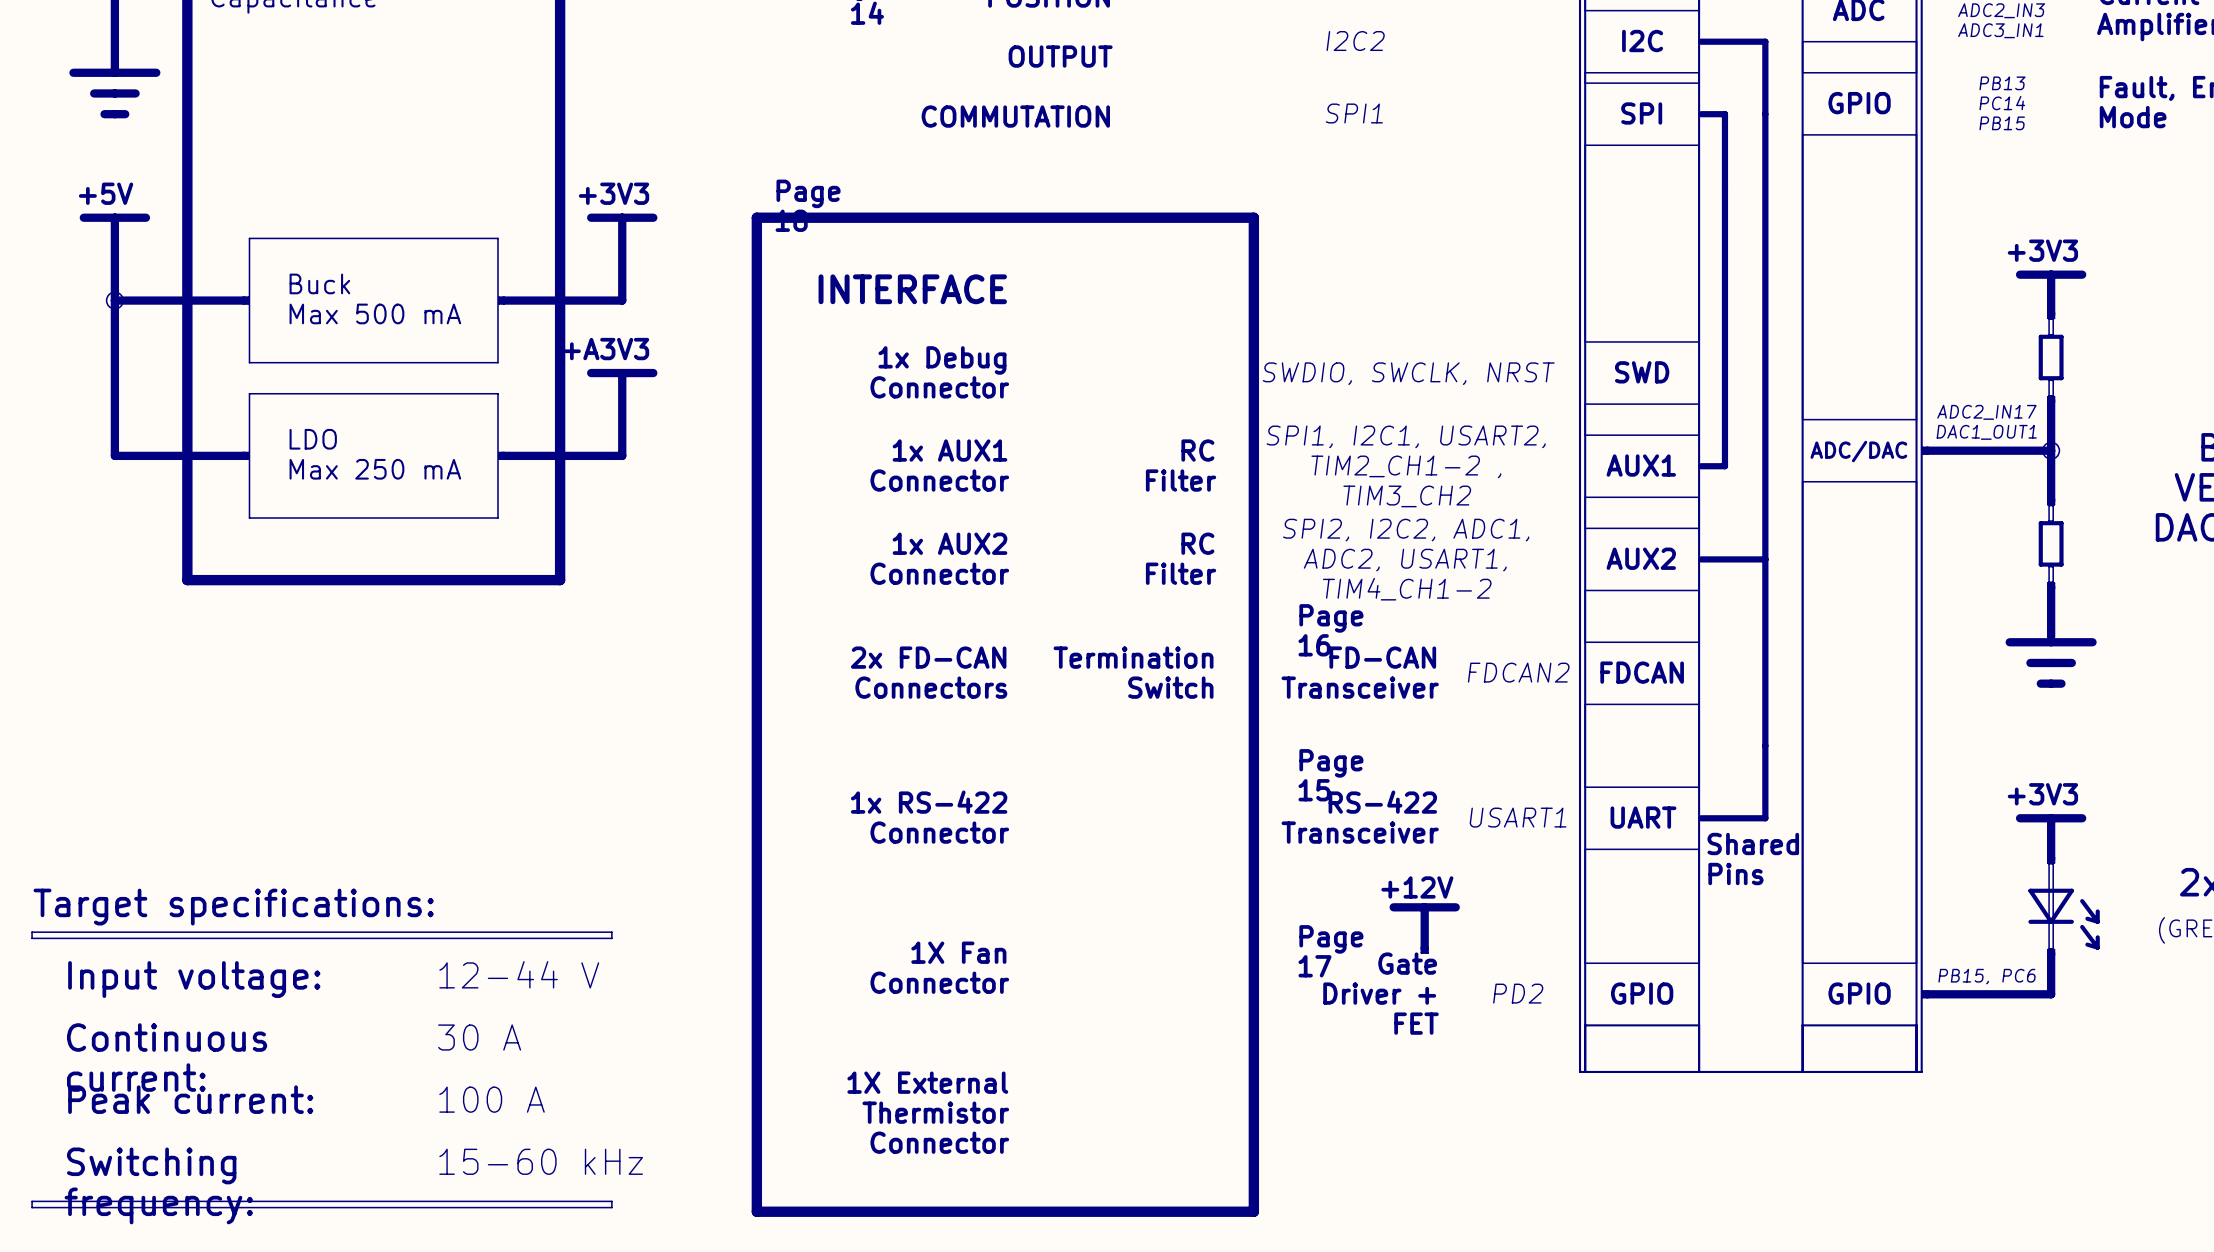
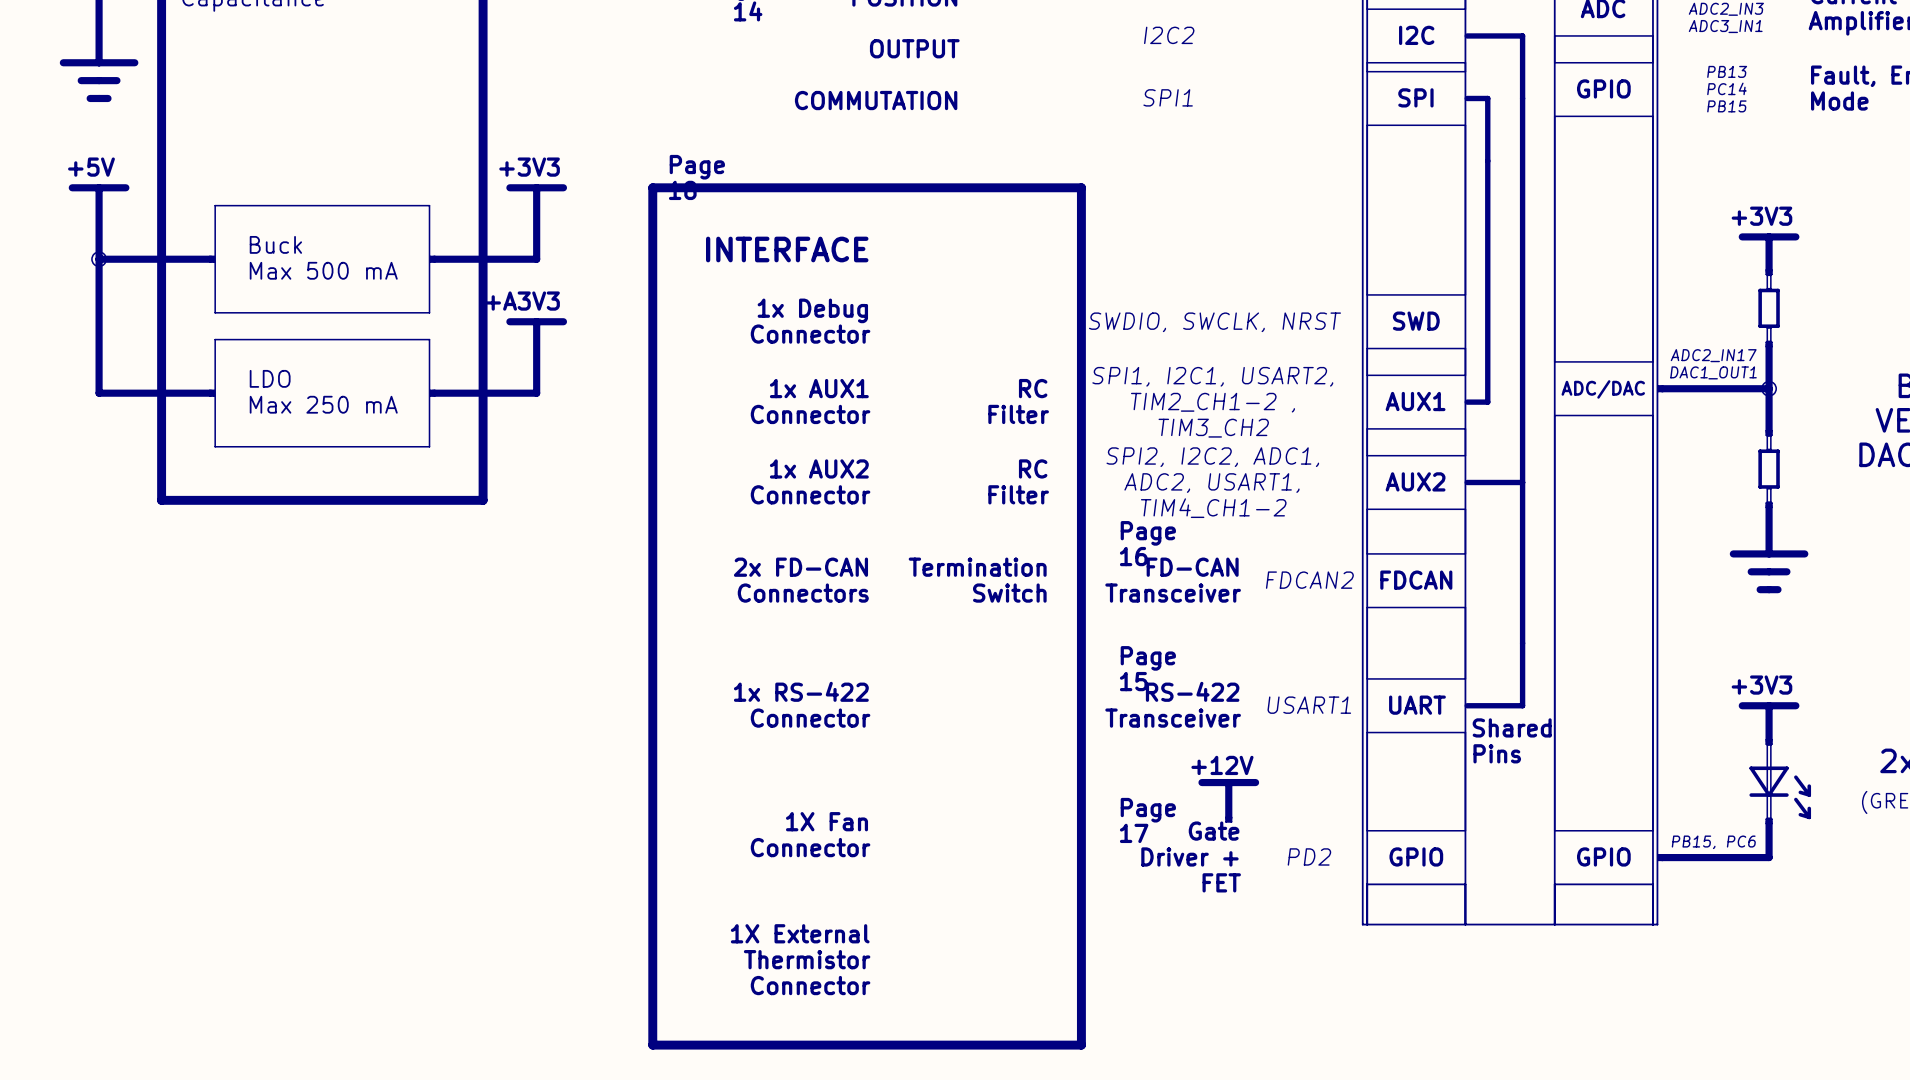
text: Target specifications: (233, 907) -> none
line: (32, 932) (32, 938) (611, 938) (611, 932) (32, 932) -> none
text: 12-44 V (519, 974) -> none
text: Input voltage: (194, 979) -> none
text: Continuous (167, 1037) -> none
text: 30 A (479, 1037) -> none
text: current: (136, 1077) -> none
text: Peak current: (190, 1099) -> none
text: 100 A (492, 1099) -> none
text: 15-60 kHz (541, 1161) -> none
text: Switching (151, 1165) -> none
line: (32, 1201) (611, 1201) (611, 1207) (32, 1207) (32, 1201) -> none
text: frequency: (158, 1205) -> none

